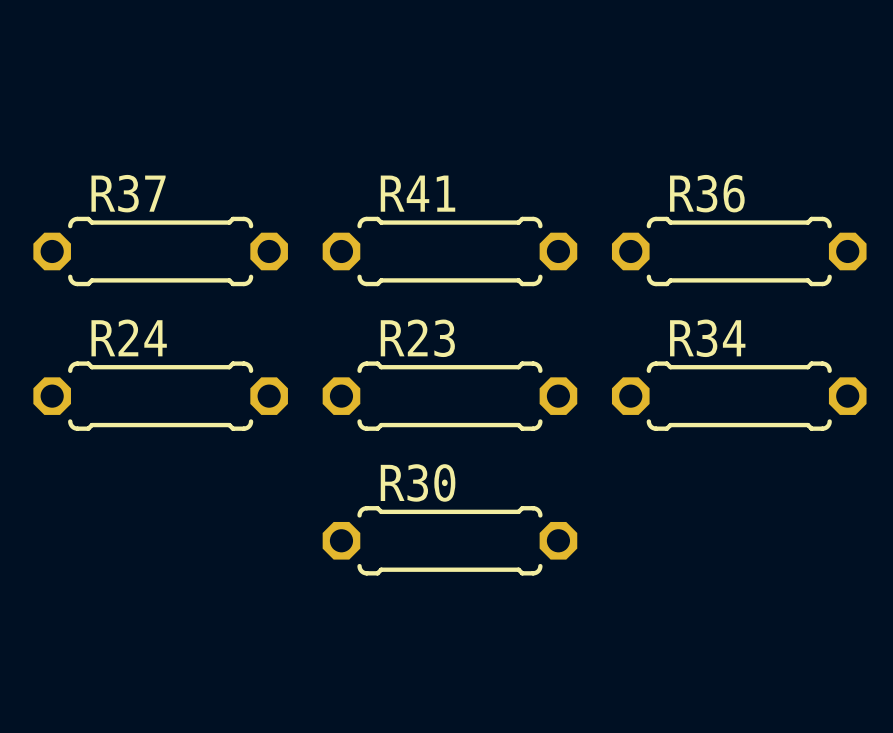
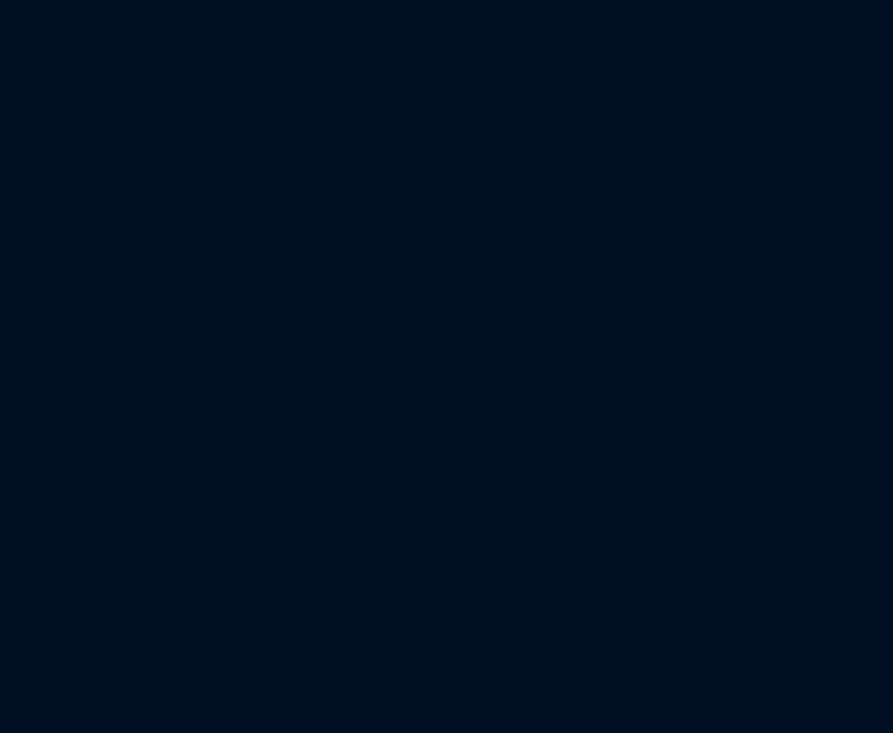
R37: (160, 251) -> none
R41: (449, 251) -> none
R36: (739, 251) -> none
R24: (160, 396) -> none
R23: (449, 396) -> none
R34: (739, 396) -> none
R30: (449, 540) -> none

